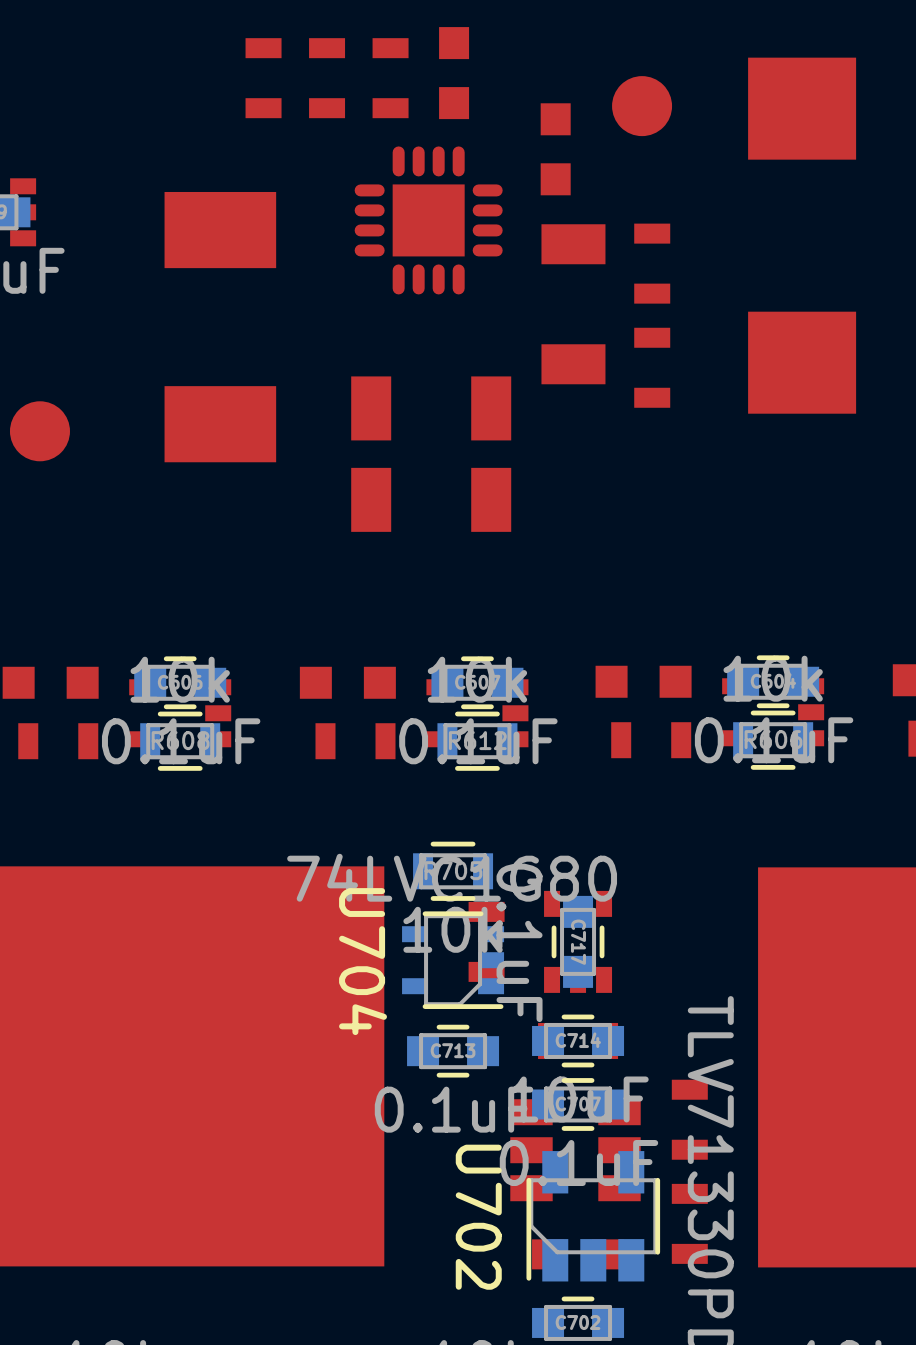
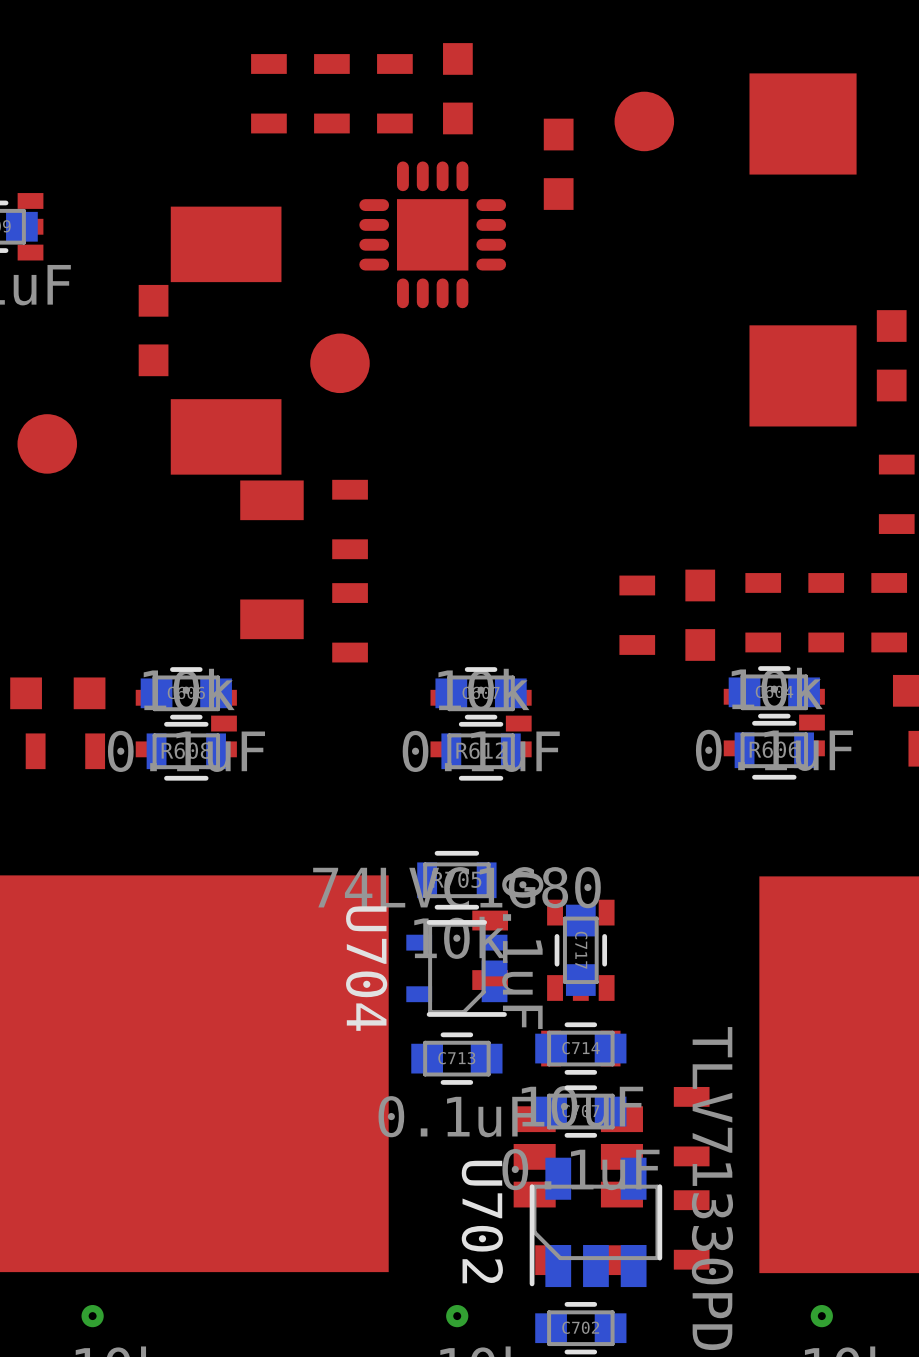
part: (652, 263) -> none
part: (573, 304) -> none
part: none -> (153, 330)
part: none -> (891, 355)
part: none -> (339, 363)
part: (652, 367) -> none
part: (431, 408) -> none
part: none -> (896, 494)
part: (431, 499) -> none
part: none -> (350, 519)
part: none -> (271, 559)
part: none -> (763, 612)
part: none -> (826, 612)
part: none -> (889, 612)
part: none -> (637, 615)
part: none -> (700, 615)
part: none -> (350, 622)
part: (643, 681) -> none
part: (347, 682) -> none
part: (651, 740) -> none
part: (355, 741) -> none
via: none -> (92, 1316)
via: none -> (457, 1316)
via: none -> (821, 1316)

